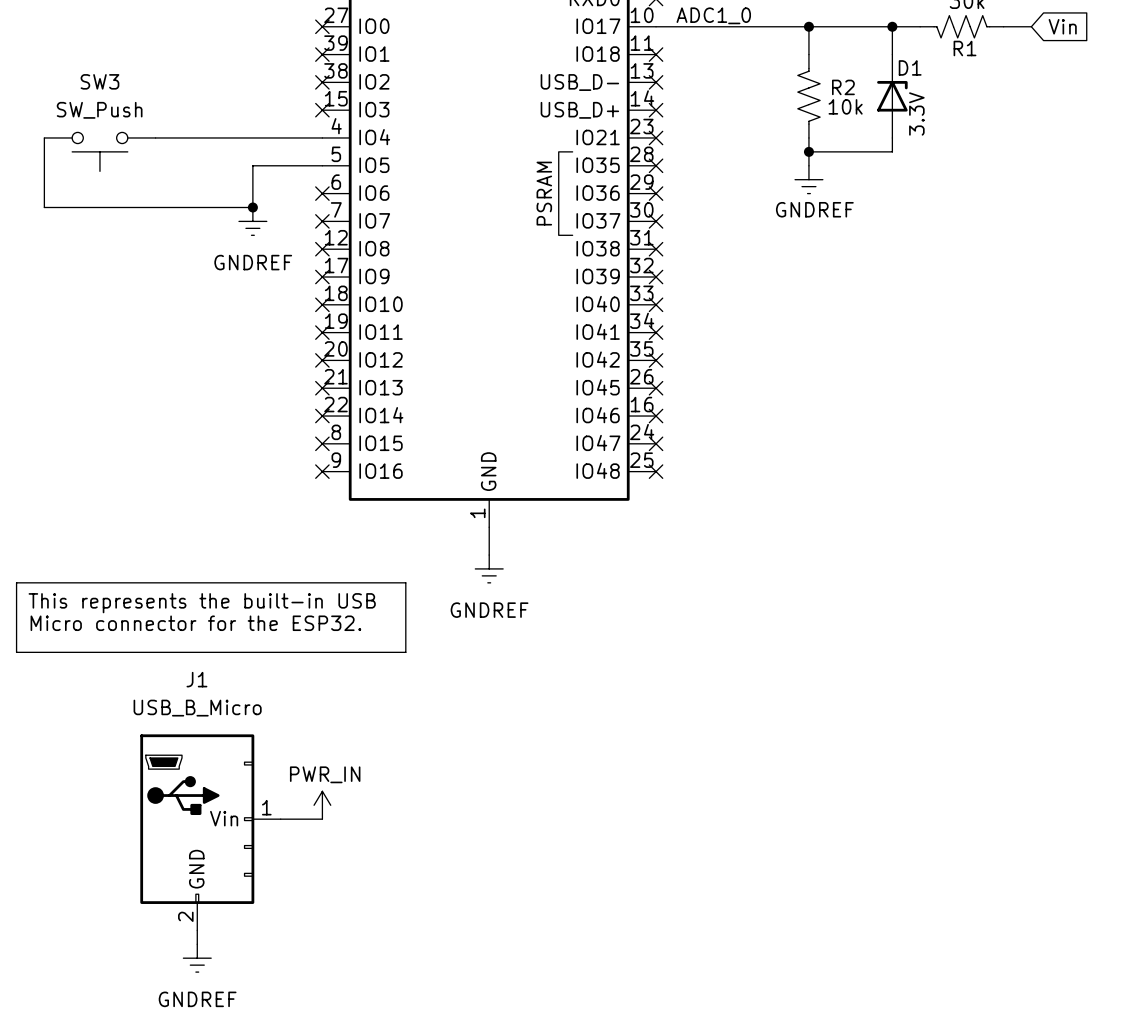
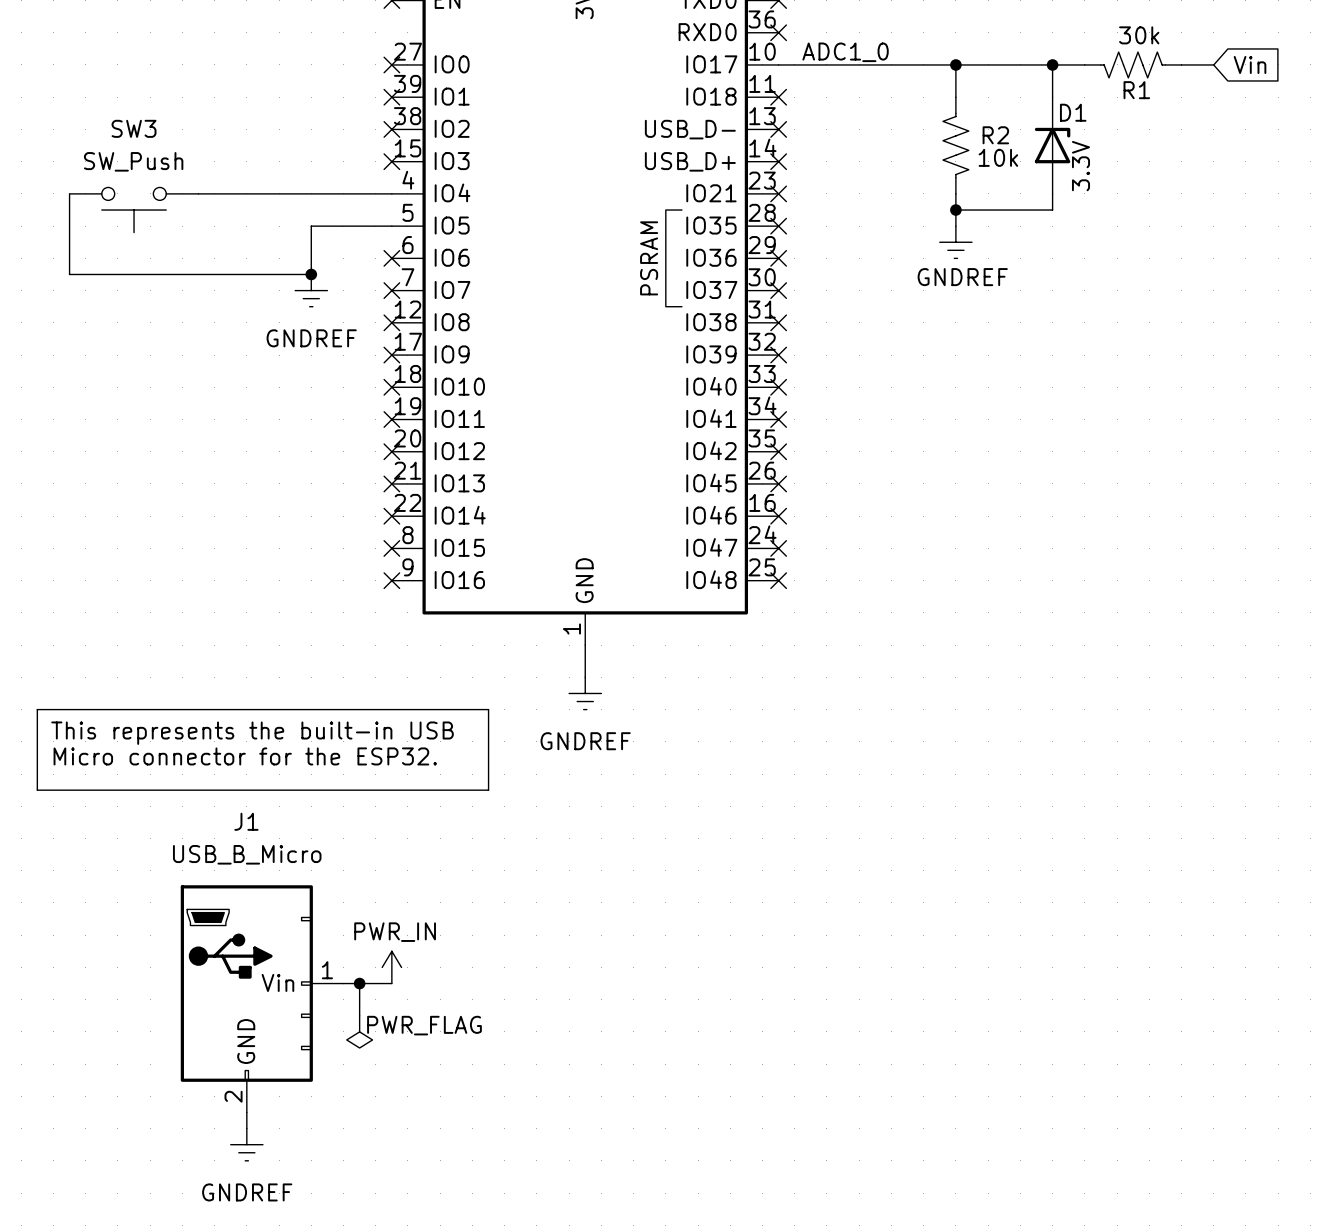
wire: none -> (359, 983) (359, 1015)
junction: none -> (359, 983)
power symbol: none -> PWR_FLAG (359, 1031)

